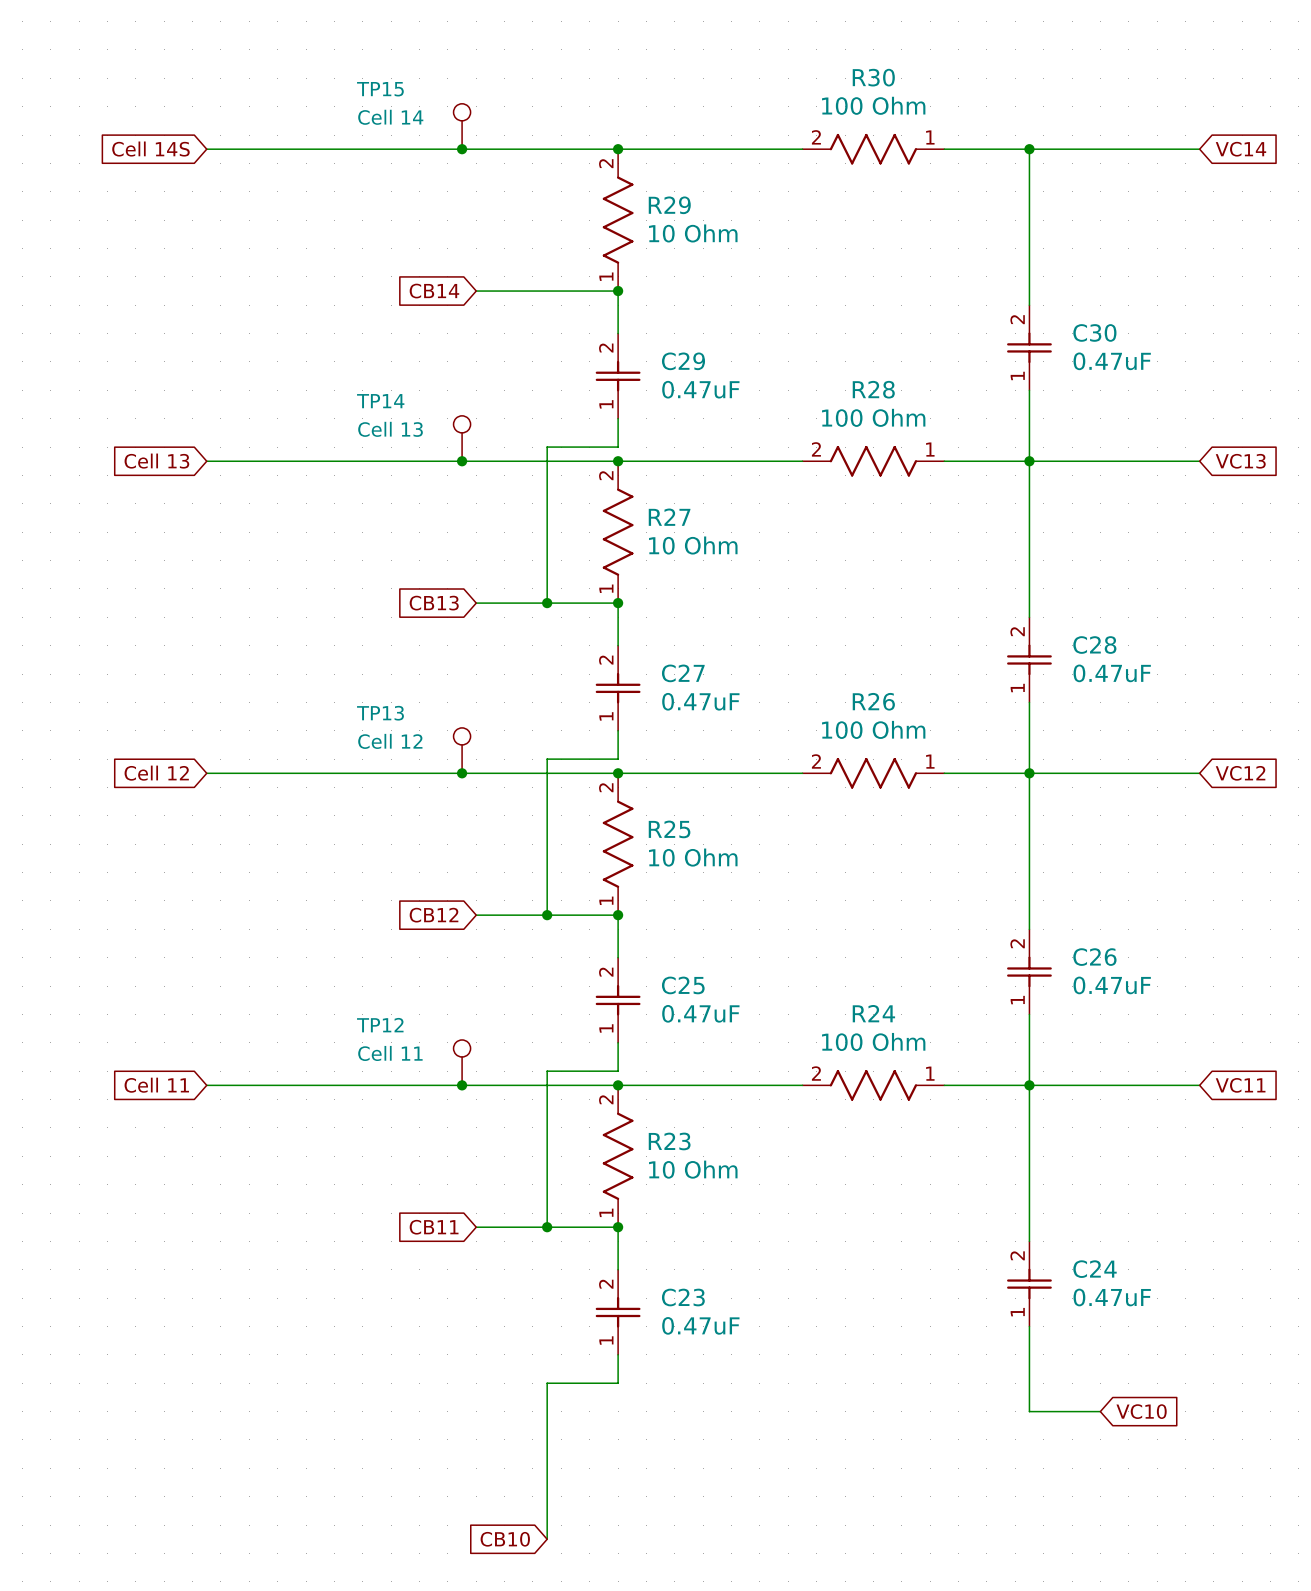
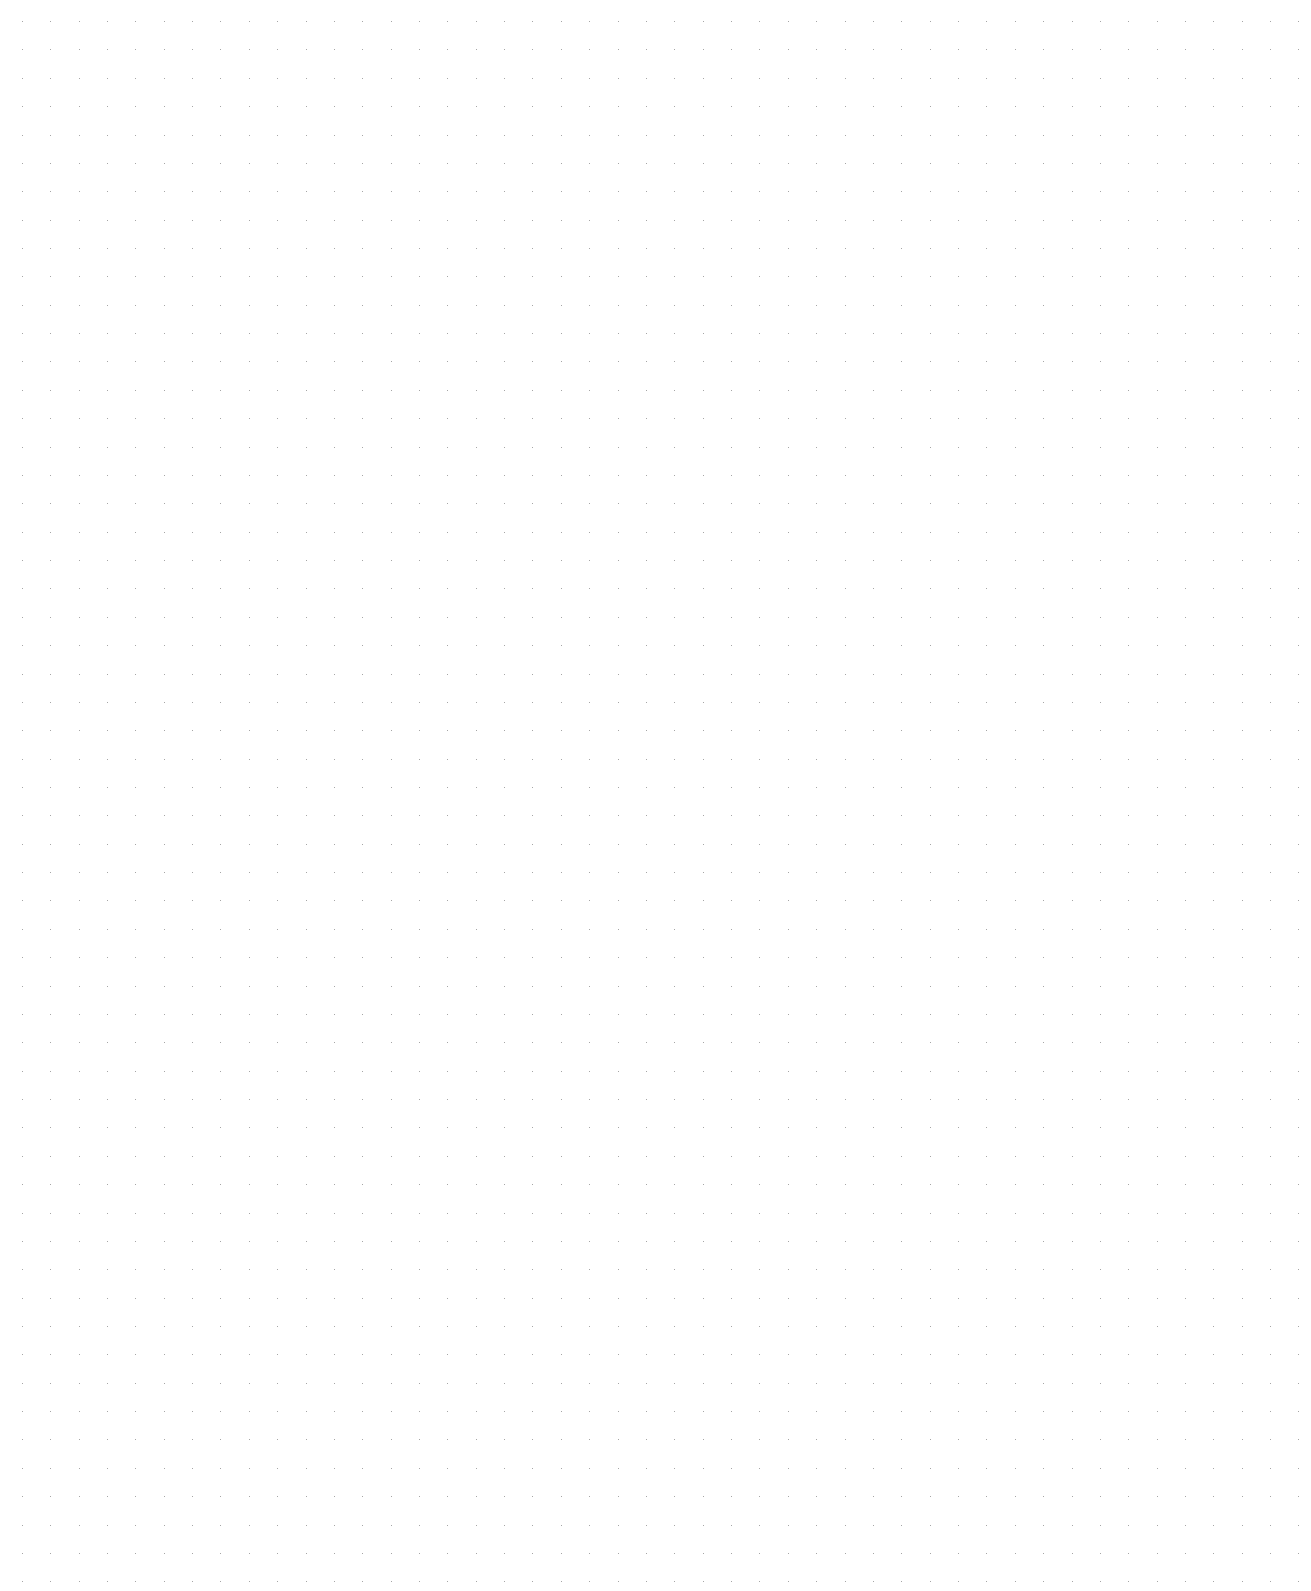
TP15: Cell 14 (462, 126) -> none
global label: Cell 14S (150, 149) -> none
wire: (206, 149) (802, 149) -> none
junction: (462, 149) -> none
junction: (618, 149) -> none
R30: 100 Ohm (873, 149) -> none
wire: (944, 149) (1199, 149) -> none
wire: (1029, 149) (1029, 305) -> none
junction: (1029, 149) -> none
global label: VC14 (1240, 149) -> none
R29: 10 Ohm (618, 220) -> none
global label: CB14 (434, 291) -> none
wire: (476, 291) (618, 291) (618, 333) -> none
junction: (618, 291) -> none
C30: 0.47uF (1029, 347) -> none
C29: 0.47uF (618, 376) -> none
wire: (1029, 390) (1029, 617) -> none
wire: (618, 418) (618, 447) (547, 447) (547, 603) -> none
TP14: Cell 13 (462, 438) -> none
global label: Cell 13 (156, 461) -> none
wire: (206, 461) (802, 461) -> none
junction: (462, 461) -> none
junction: (618, 461) -> none
R28: 100 Ohm (873, 461) -> none
wire: (944, 461) (1199, 461) -> none
junction: (1029, 461) -> none
global label: VC13 (1240, 461) -> none
R27: 10 Ohm (618, 532) -> none
global label: CB13 (434, 603) -> none
wire: (476, 603) (618, 603) (618, 645) -> none
junction: (547, 603) -> none
junction: (618, 603) -> none
C28: 0.47uF (1029, 659) -> none
C27: 0.47uF (618, 688) -> none
wire: (1029, 702) (1029, 929) -> none
wire: (618, 730) (618, 759) (547, 759) (547, 915) -> none
TP13: Cell 12 (462, 750) -> none
global label: Cell 12 (156, 773) -> none
wire: (206, 773) (802, 773) -> none
junction: (462, 773) -> none
junction: (618, 773) -> none
R26: 100 Ohm (873, 773) -> none
wire: (944, 773) (1199, 773) -> none
junction: (1029, 773) -> none
global label: VC12 (1240, 773) -> none
R25: 10 Ohm (618, 844) -> none
global label: CB12 (434, 915) -> none
wire: (476, 915) (618, 915) (618, 957) -> none
junction: (547, 915) -> none
junction: (618, 915) -> none
C26: 0.47uF (1029, 971) -> none
C25: 0.47uF (618, 1000) -> none
wire: (1029, 1014) (1029, 1241) -> none
wire: (618, 1042) (618, 1071) (547, 1071) (547, 1227) -> none
TP12: Cell 11 (462, 1062) -> none
global label: Cell 11 (156, 1085) -> none
wire: (206, 1085) (802, 1085) -> none
junction: (462, 1085) -> none
junction: (618, 1085) -> none
R24: 100 Ohm (873, 1085) -> none
wire: (944, 1085) (1199, 1085) -> none
junction: (1029, 1085) -> none
global label: VC11 (1240, 1085) -> none
R23: 10 Ohm (618, 1156) -> none
global label: CB11 (434, 1227) -> none
wire: (476, 1227) (618, 1227) (618, 1269) -> none
junction: (547, 1227) -> none
junction: (618, 1227) -> none
C24: 0.47uF (1029, 1283) -> none
C23: 0.47uF (618, 1312) -> none
wire: (1029, 1326) (1029, 1411) (1100, 1411) -> none
wire: (618, 1354) (618, 1383) (547, 1383) (547, 1539) -> none
global label: VC10 (1141, 1411) -> none
global label: CB10 (505, 1539) -> none

